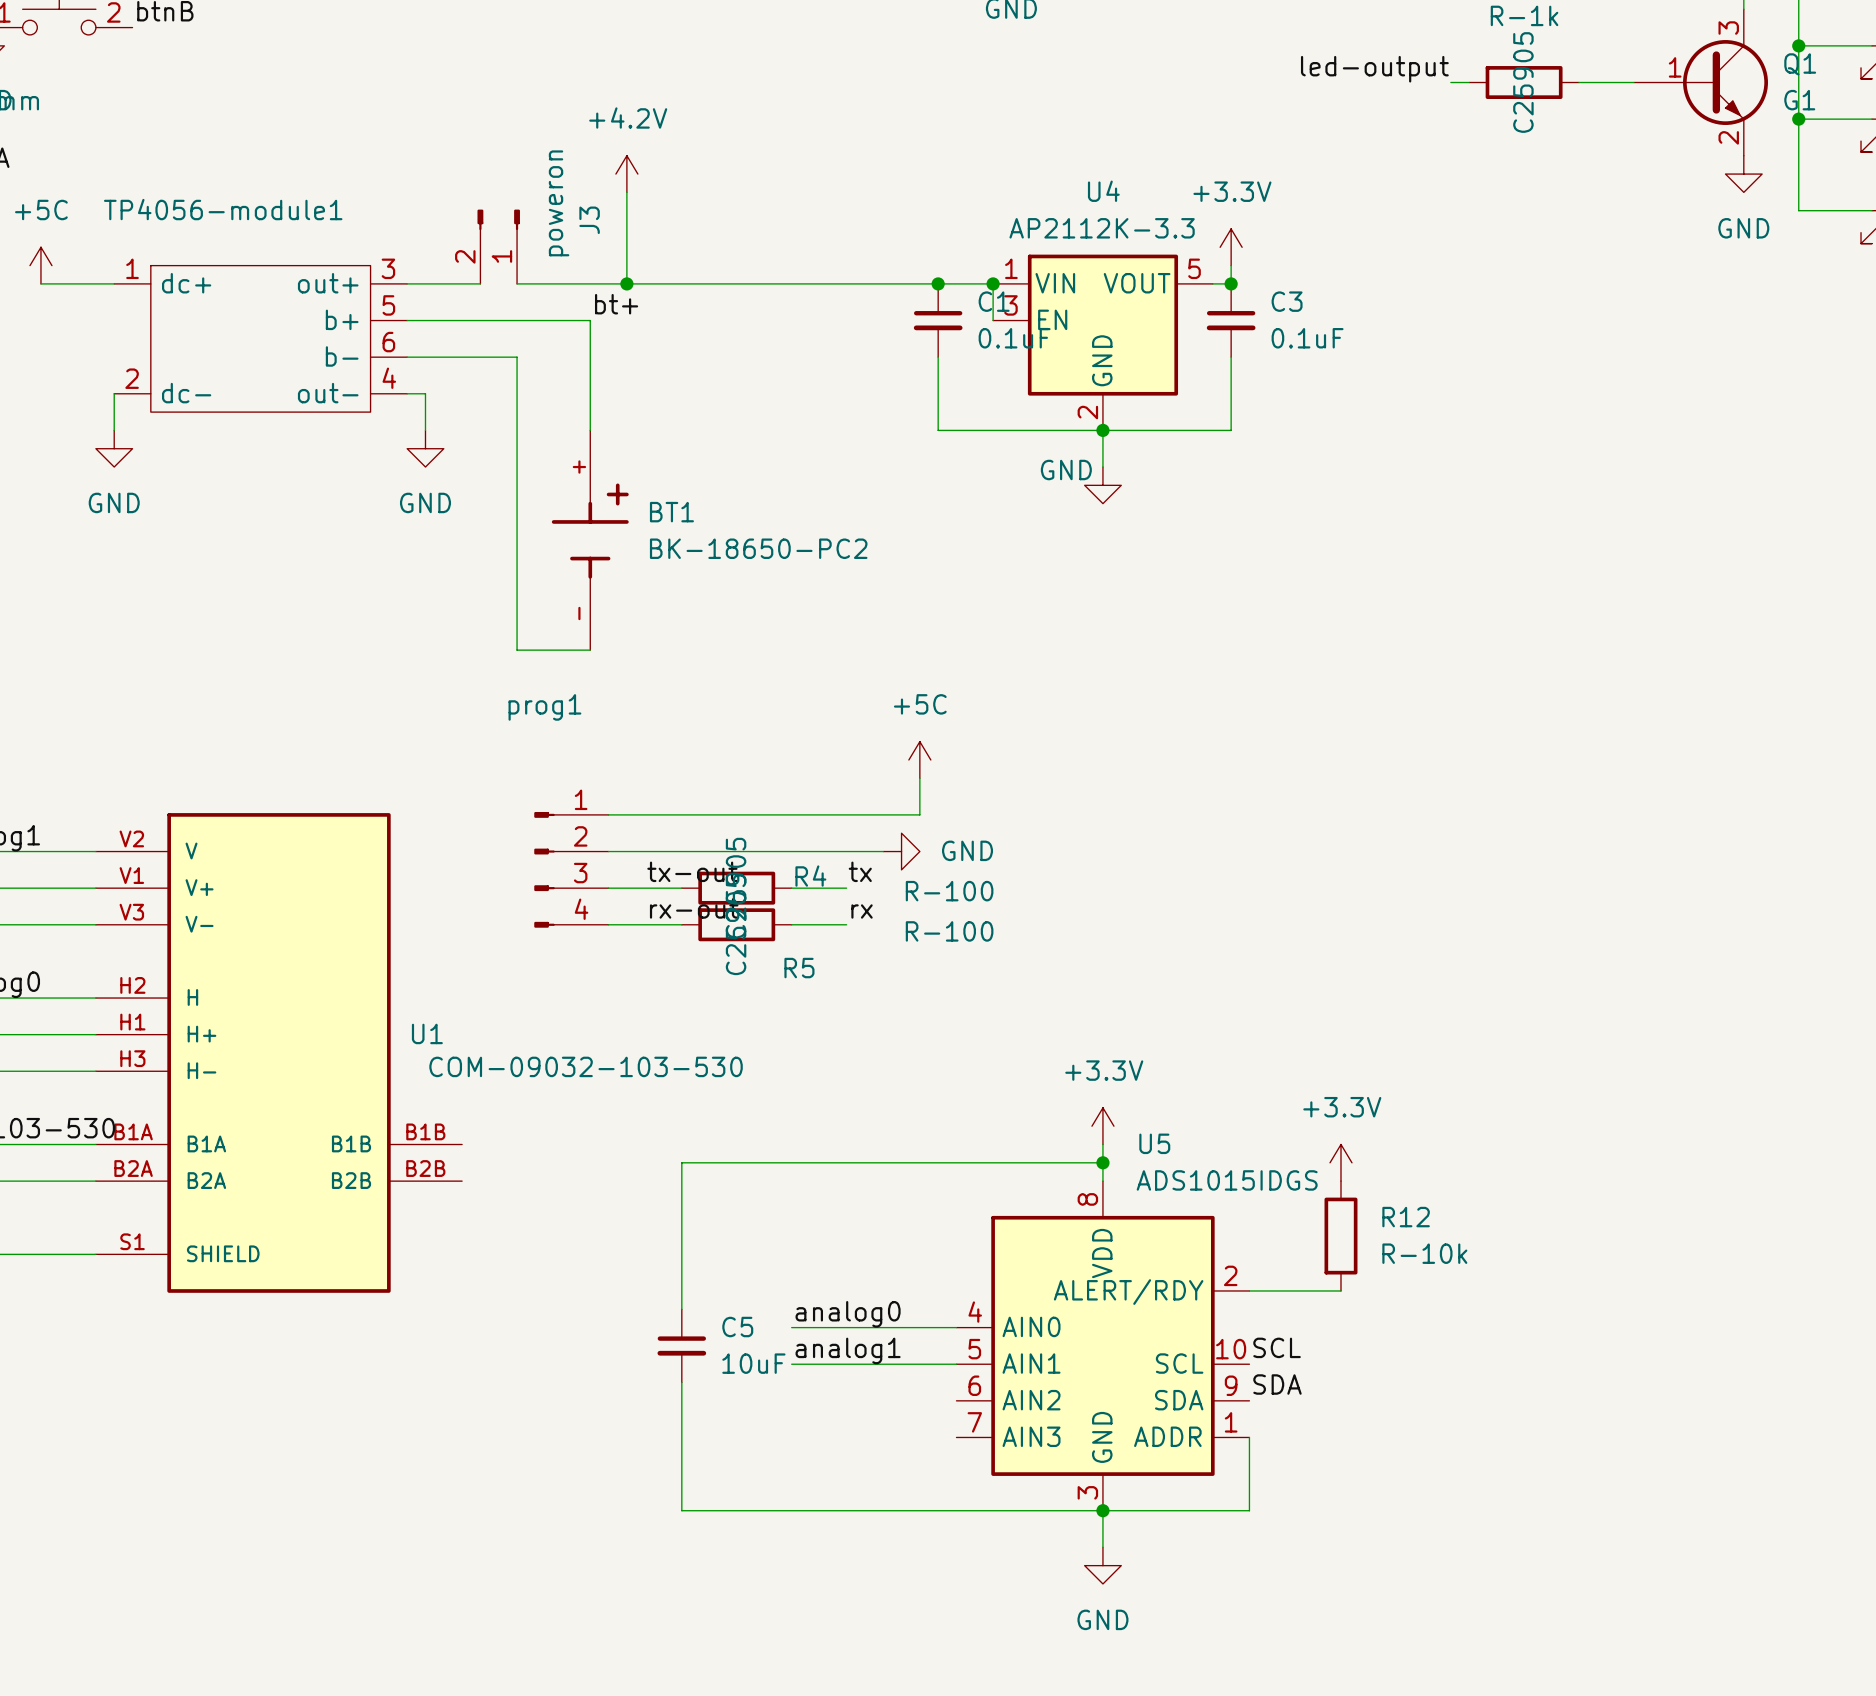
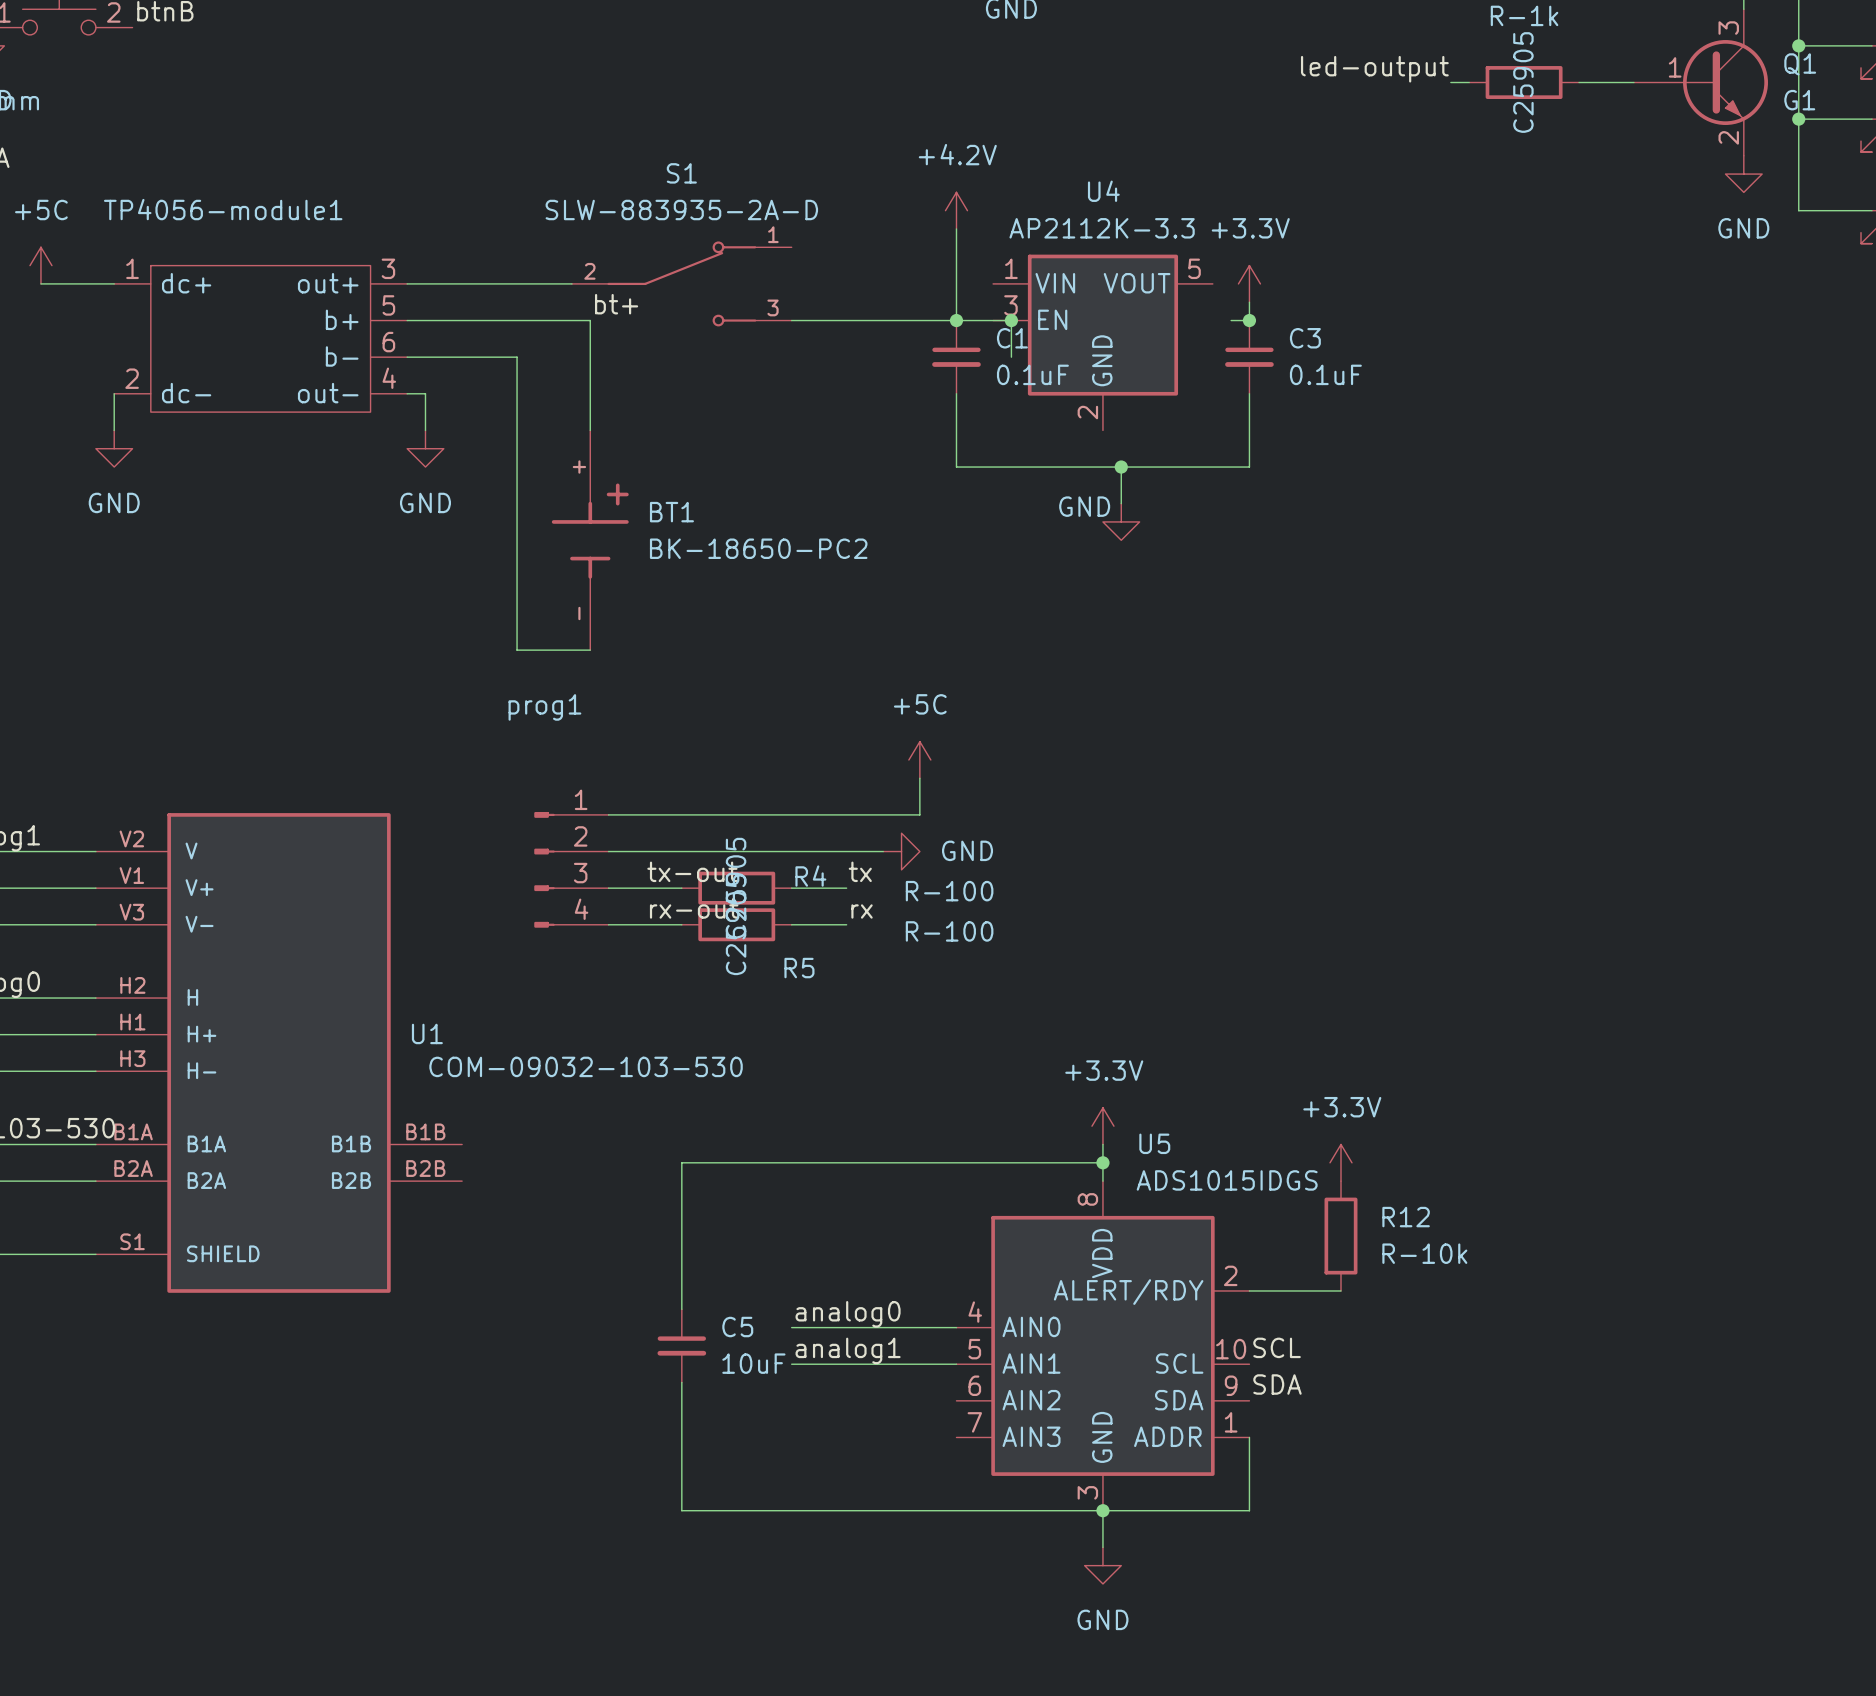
power symbol position: +4.2V (626, 174) -> +4.2V (956, 210)
wire: (626, 192) (626, 283) -> (956, 228) (956, 320)
J3: poweron (498, 246) -> none
power symbol position: +3.3V (1231, 247) -> +3.3V (1249, 283)
wire: (1231, 265) (1231, 283) (1212, 283) -> (1249, 302) (1249, 320) (1231, 320)
wire: none -> (480, 283) (517, 283)
wire: (571, 283) (993, 283) (993, 320) -> none
junction: (626, 283) -> none
S1: none -> SLW-883935-2A-D (681, 283)
junction: (938, 283) -> none
junction: (993, 283) -> none
junction position: (1231, 283) -> (1249, 320)
wire: none -> (791, 320) (1011, 320) (1011, 357)
C1 position: (938, 320) -> (956, 357)
junction: none -> (956, 320)
junction: none -> (1011, 320)
C3 position: (1231, 320) -> (1249, 357)
wire: (938, 357) (938, 430) (1231, 430) (1231, 357) -> (956, 393) (956, 467) (1249, 467) (1249, 393)
wire: (1102, 430) (1102, 467) -> (1121, 467) (1121, 503)
junction position: (1102, 430) -> (1121, 467)
power symbol position: GND (1102, 485) -> GND (1121, 521)

